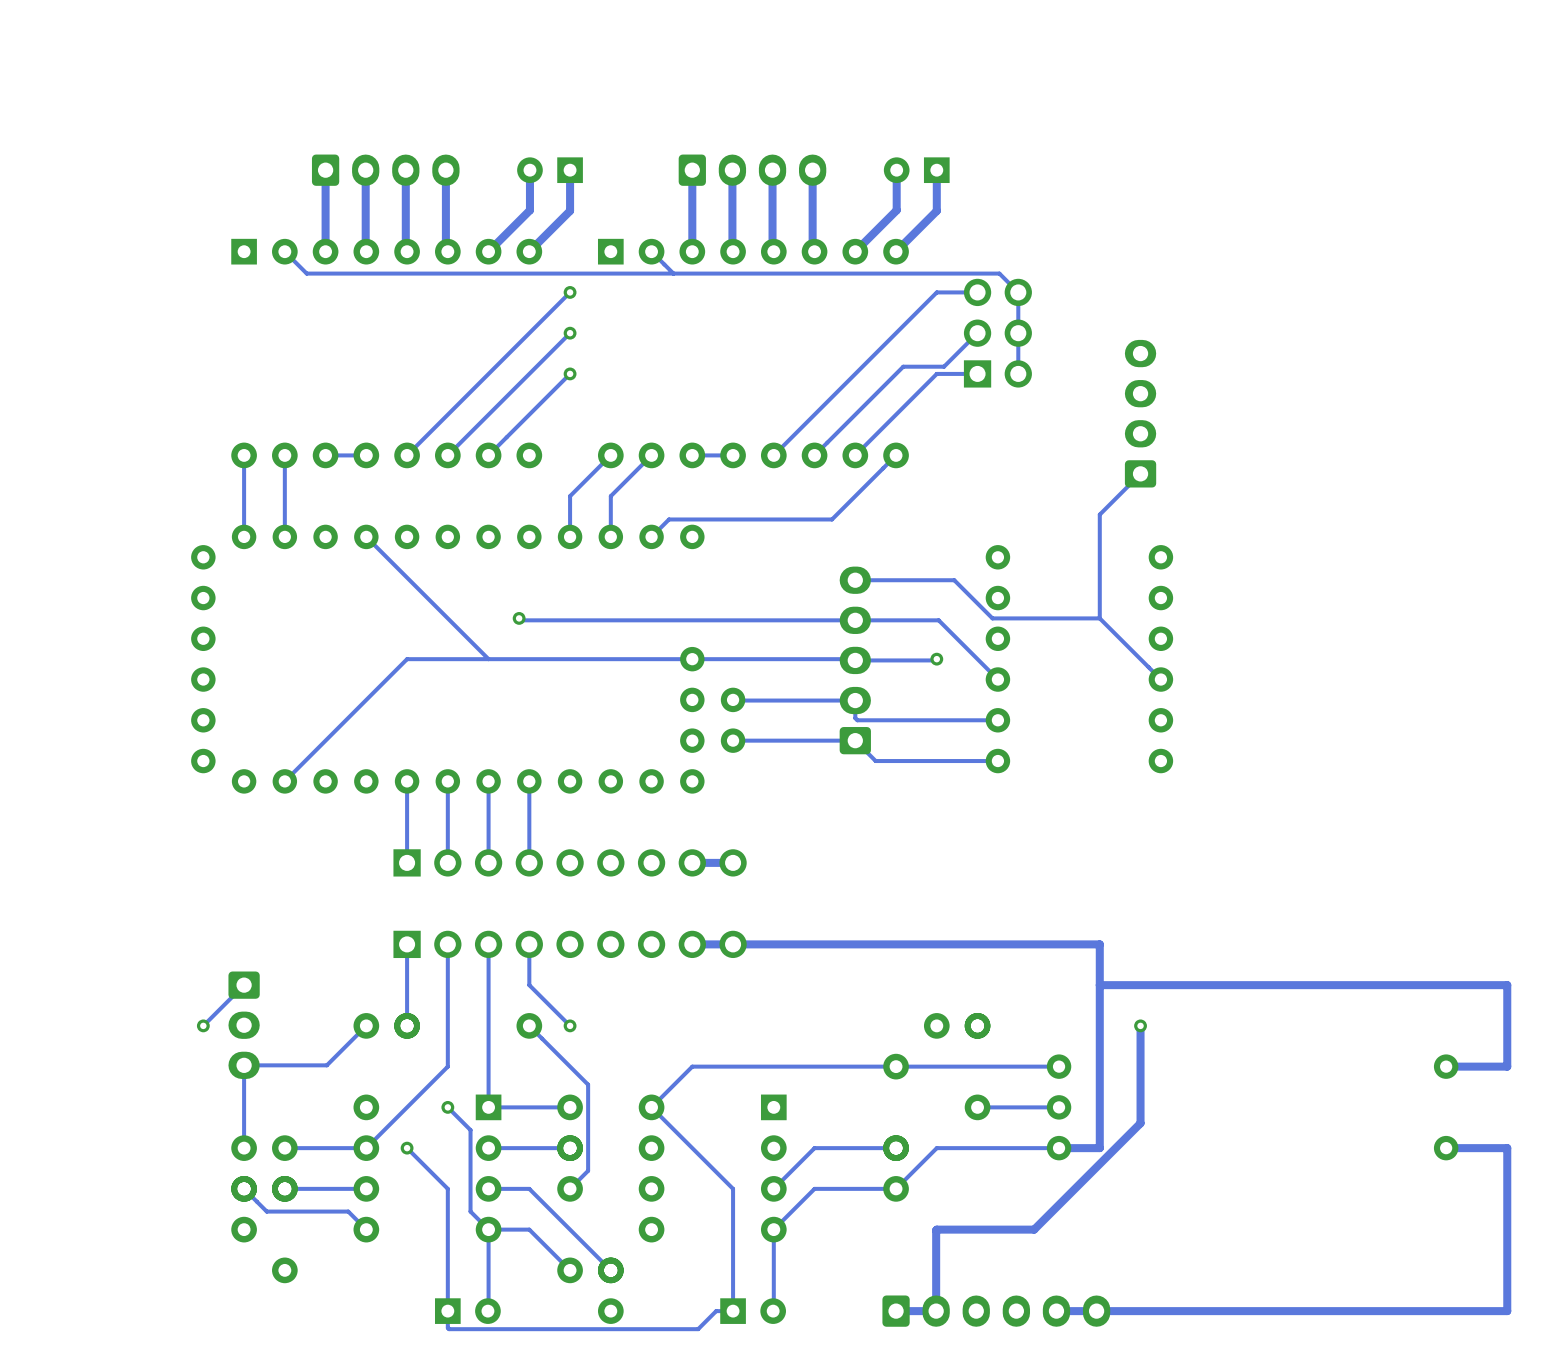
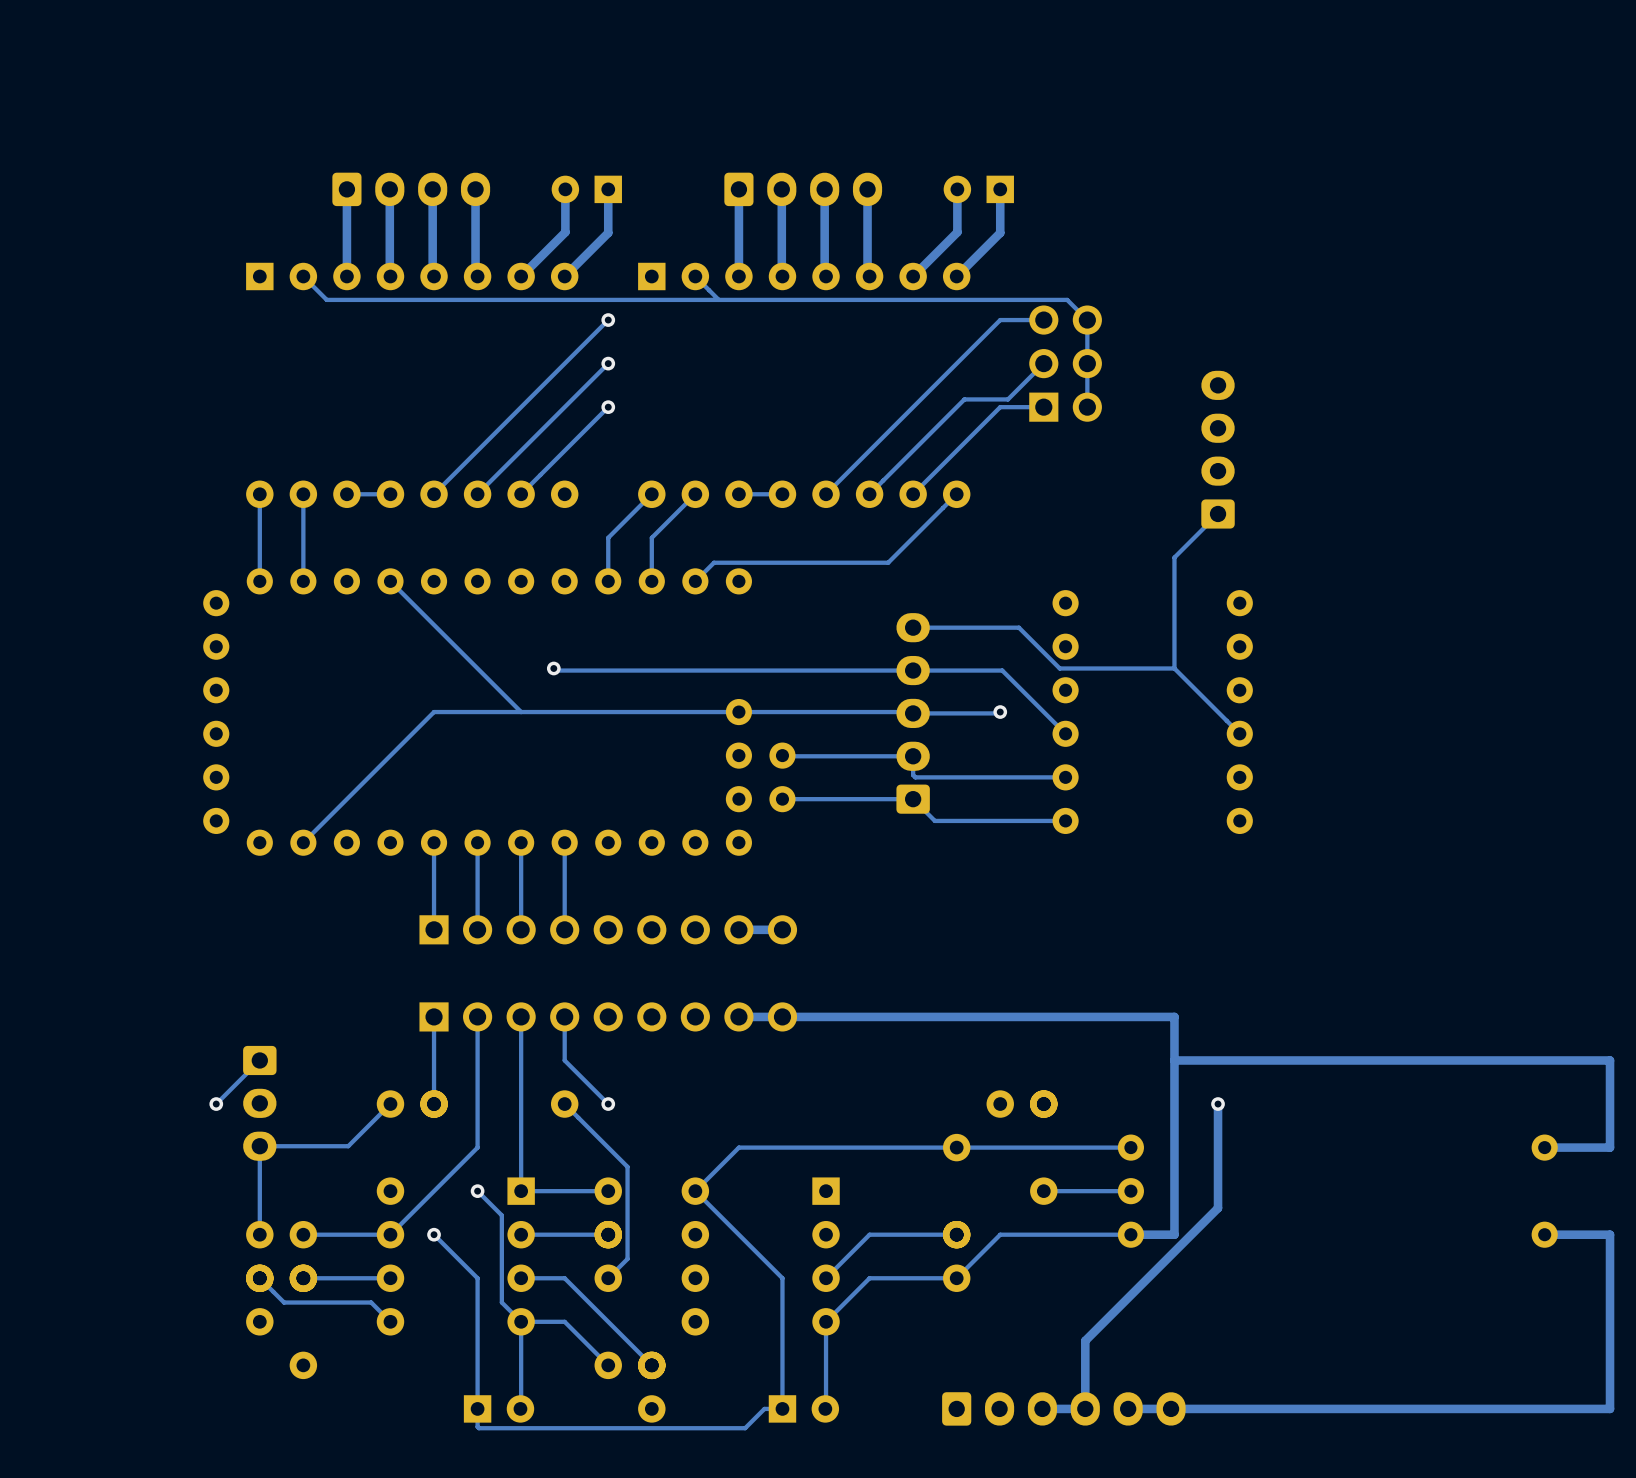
track: (1034, 1229) (936, 1229) (936, 1311) (896, 1311) -> (1104, 1321) (1085, 1340) (1085, 1408) (1042, 1408)

